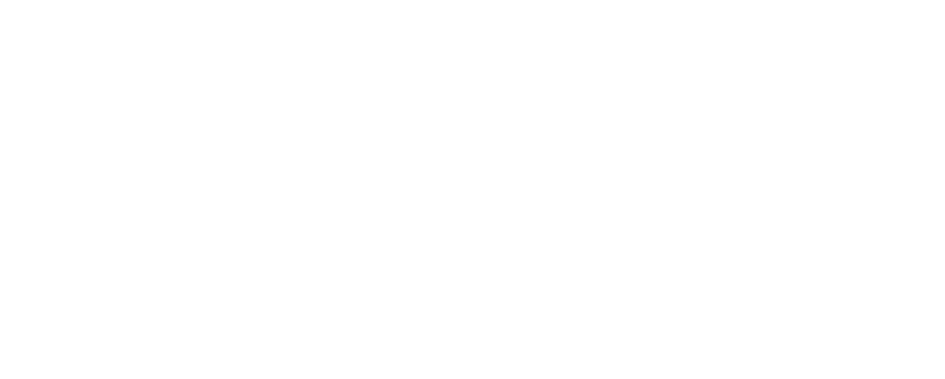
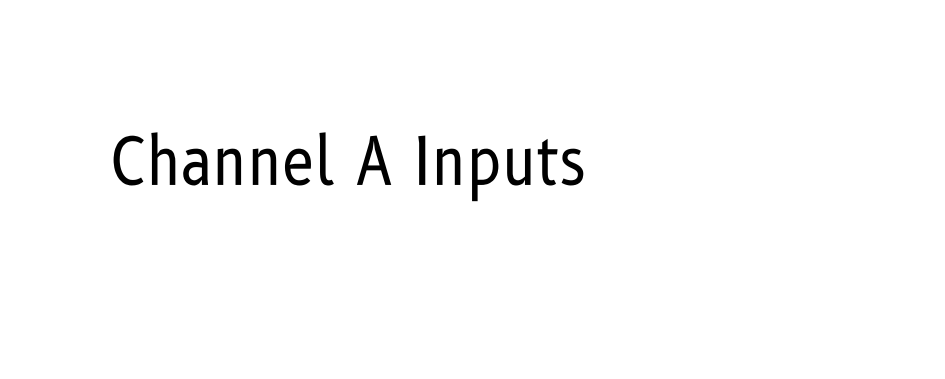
text: none -> Channel A Inputs (348, 166)

